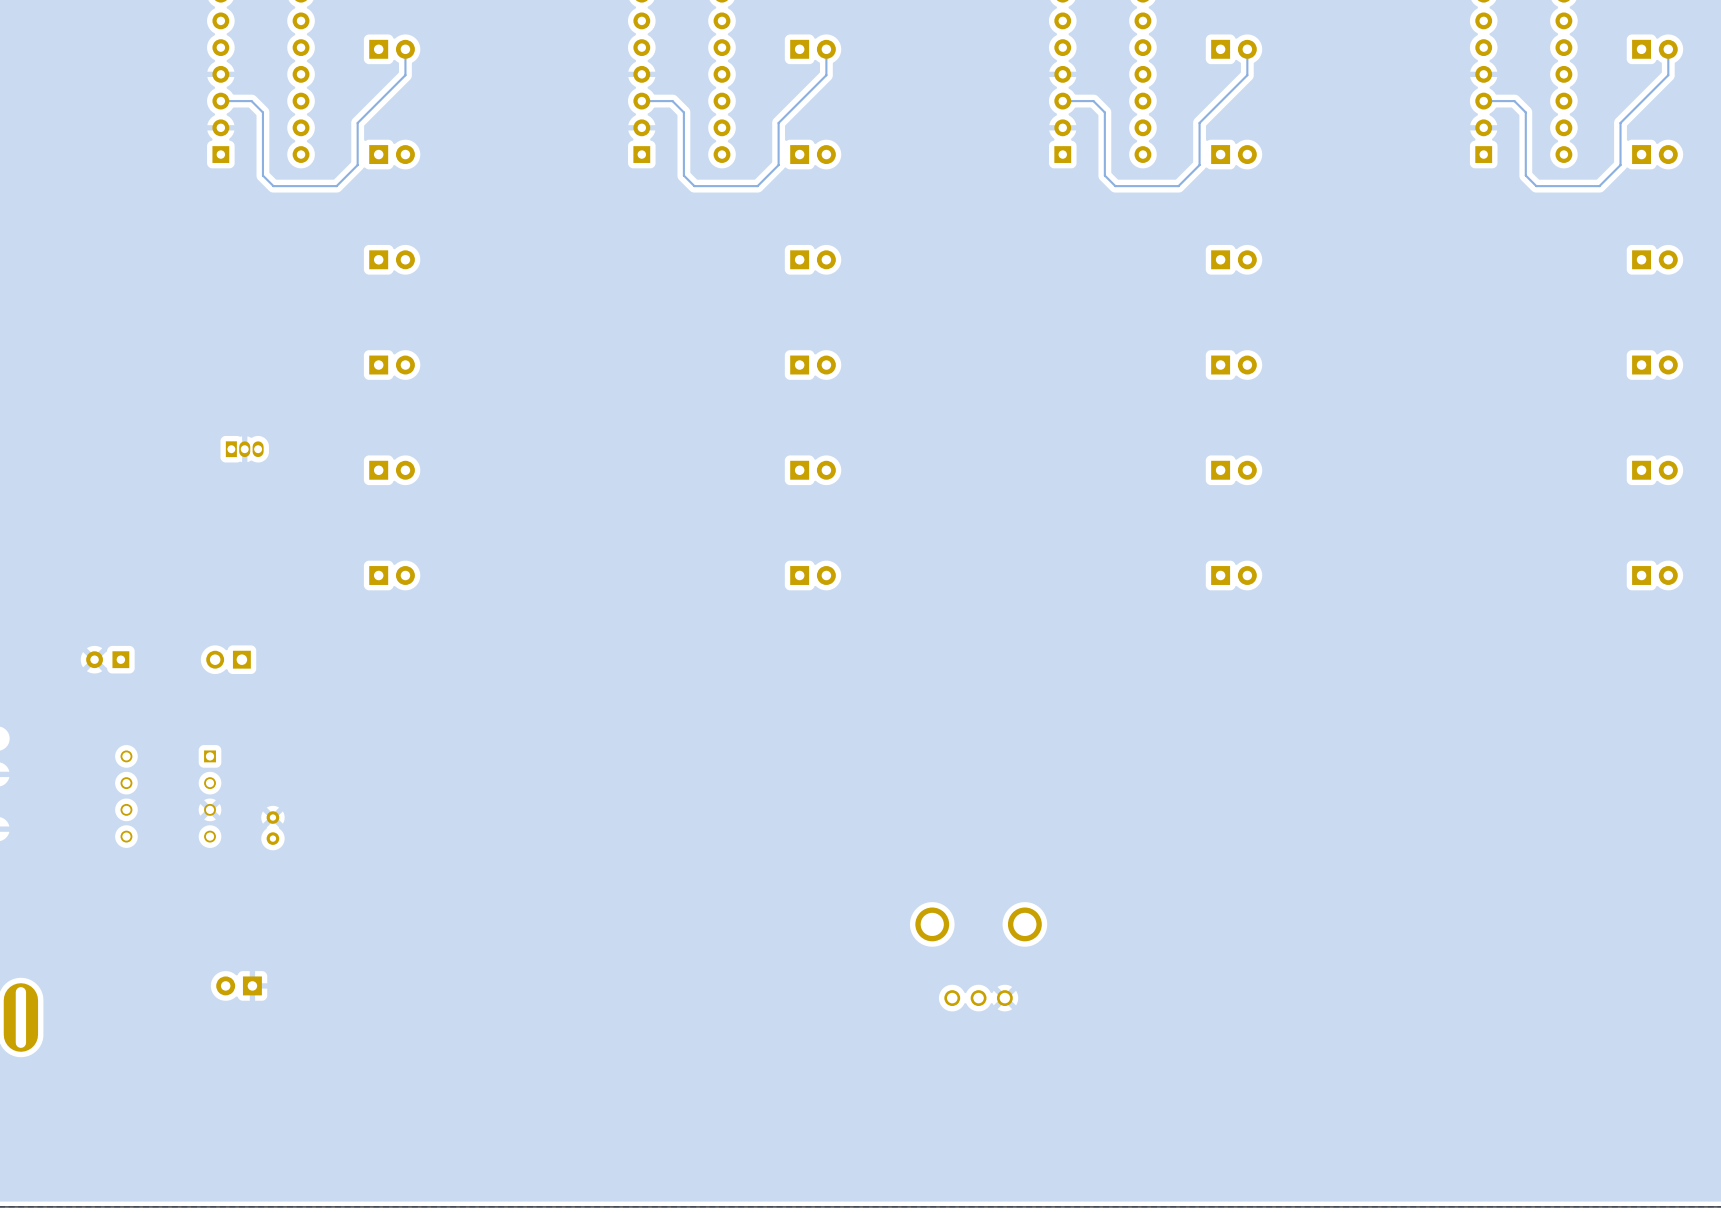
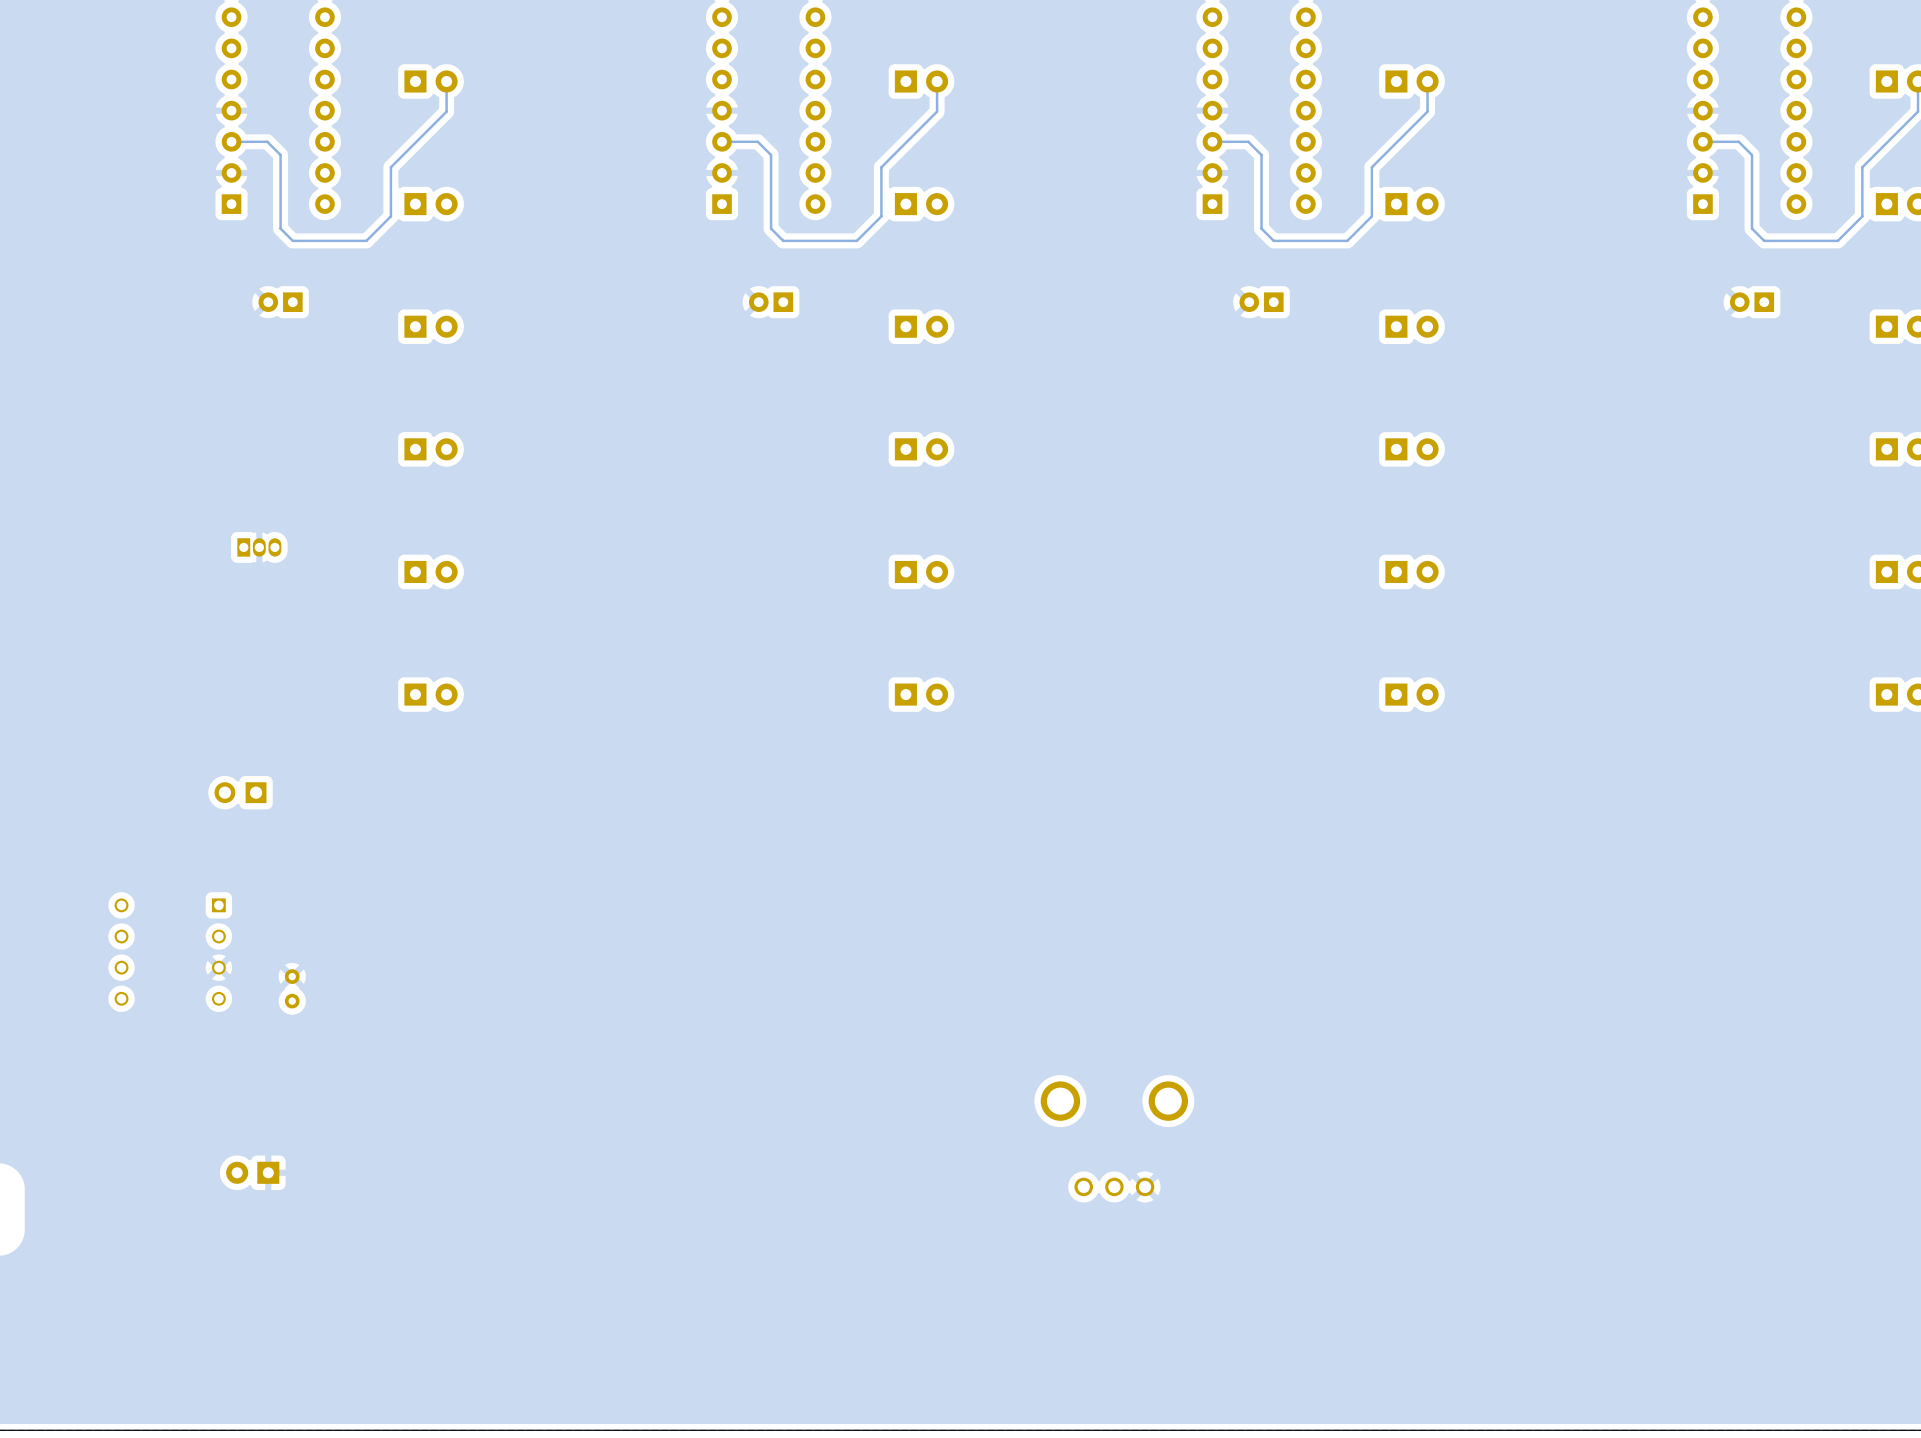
part: none -> (280, 302)
part: none -> (771, 302)
part: none -> (1261, 302)
part: none -> (1752, 302)
part: (107, 659) -> none

